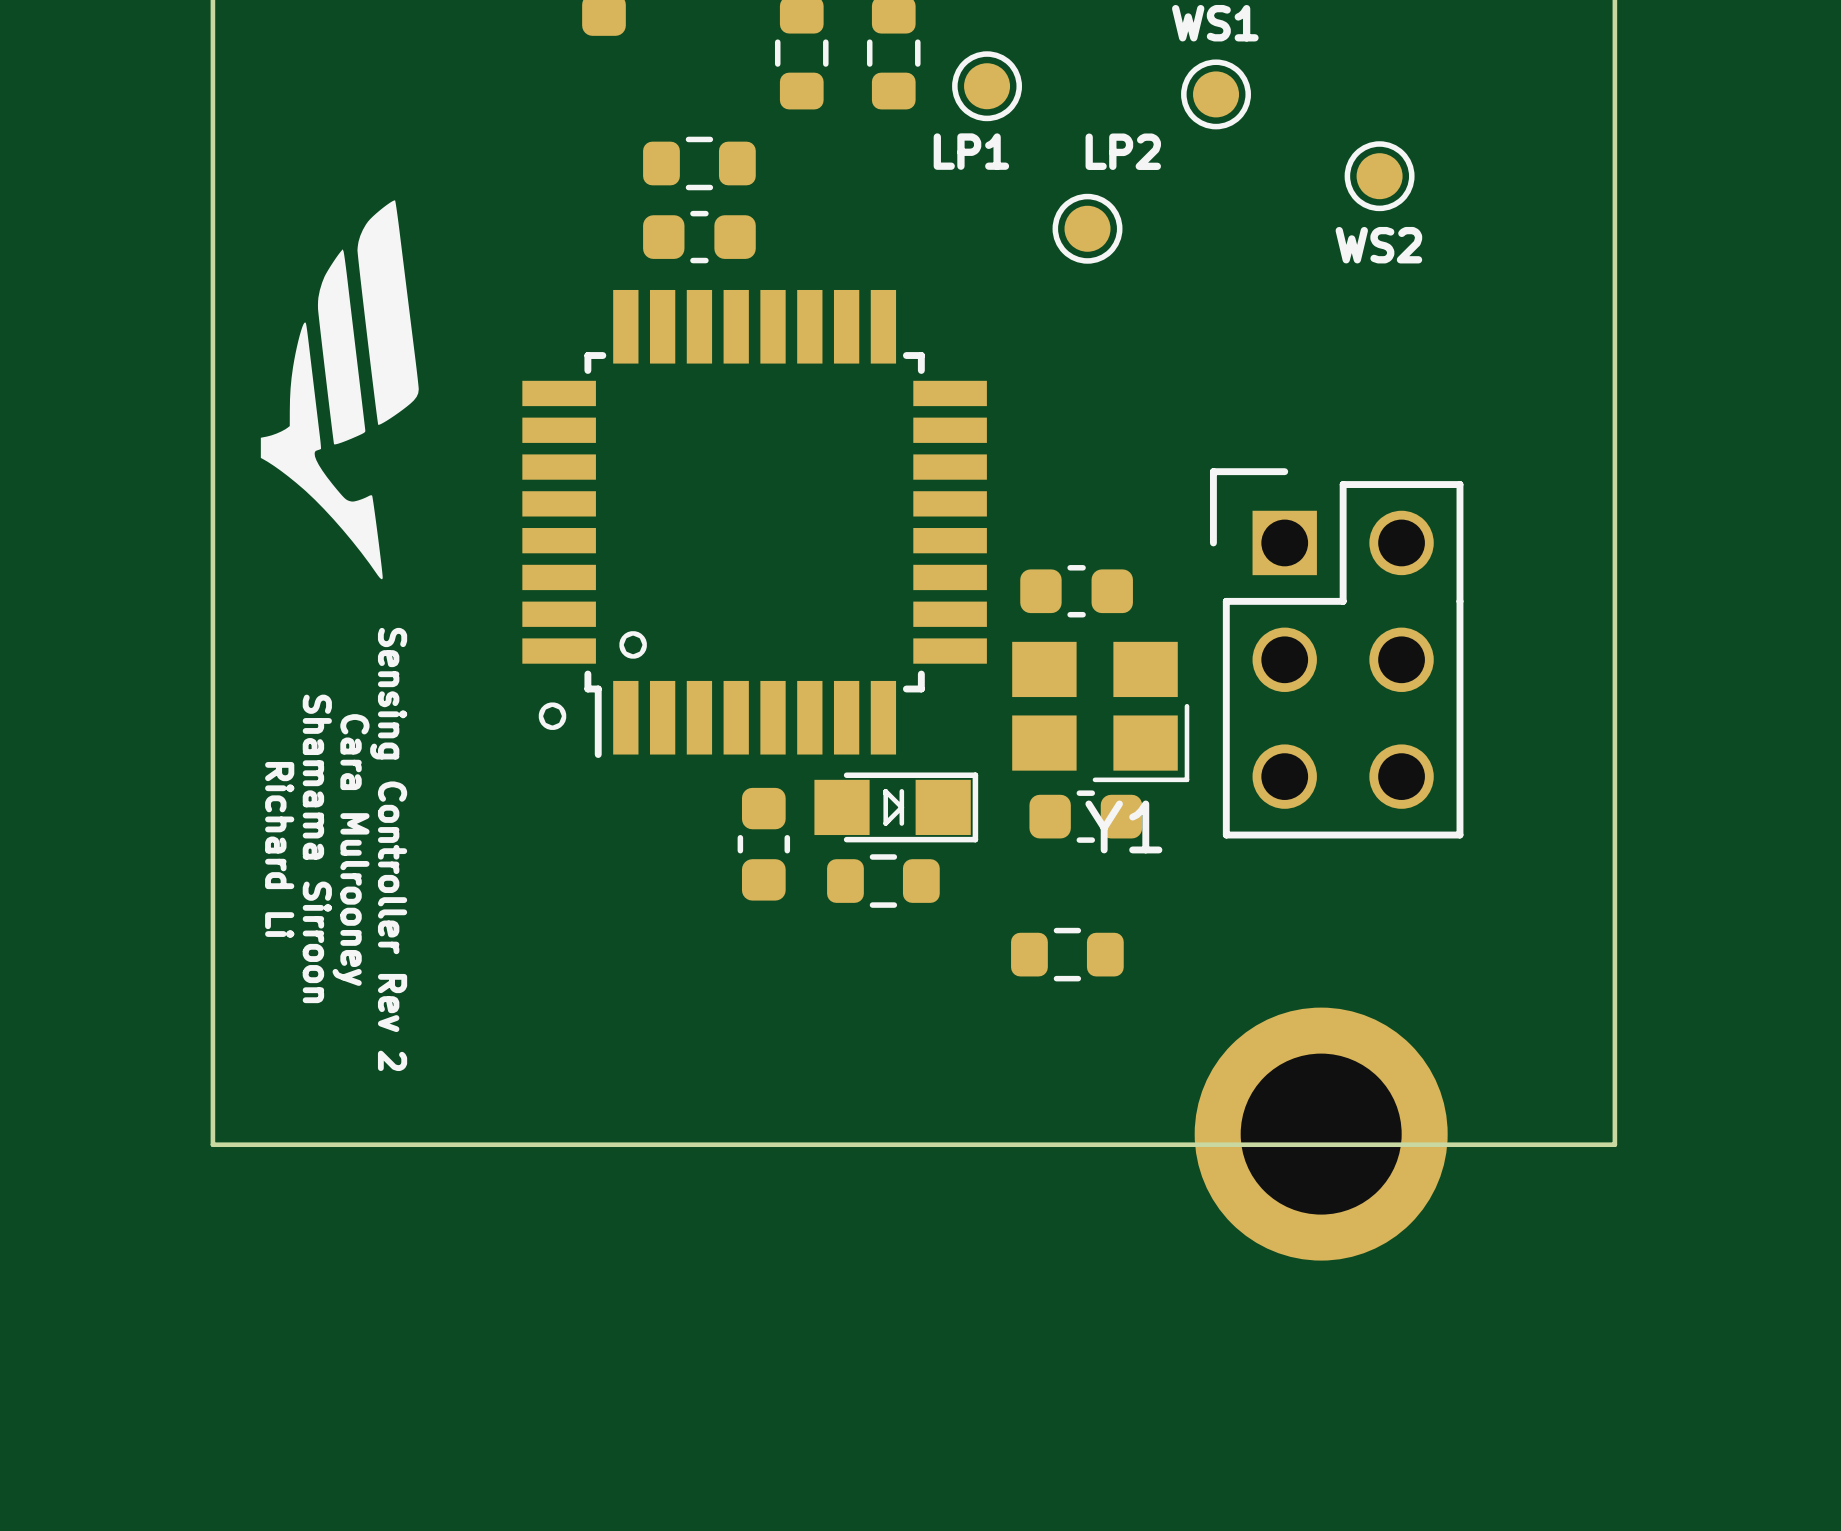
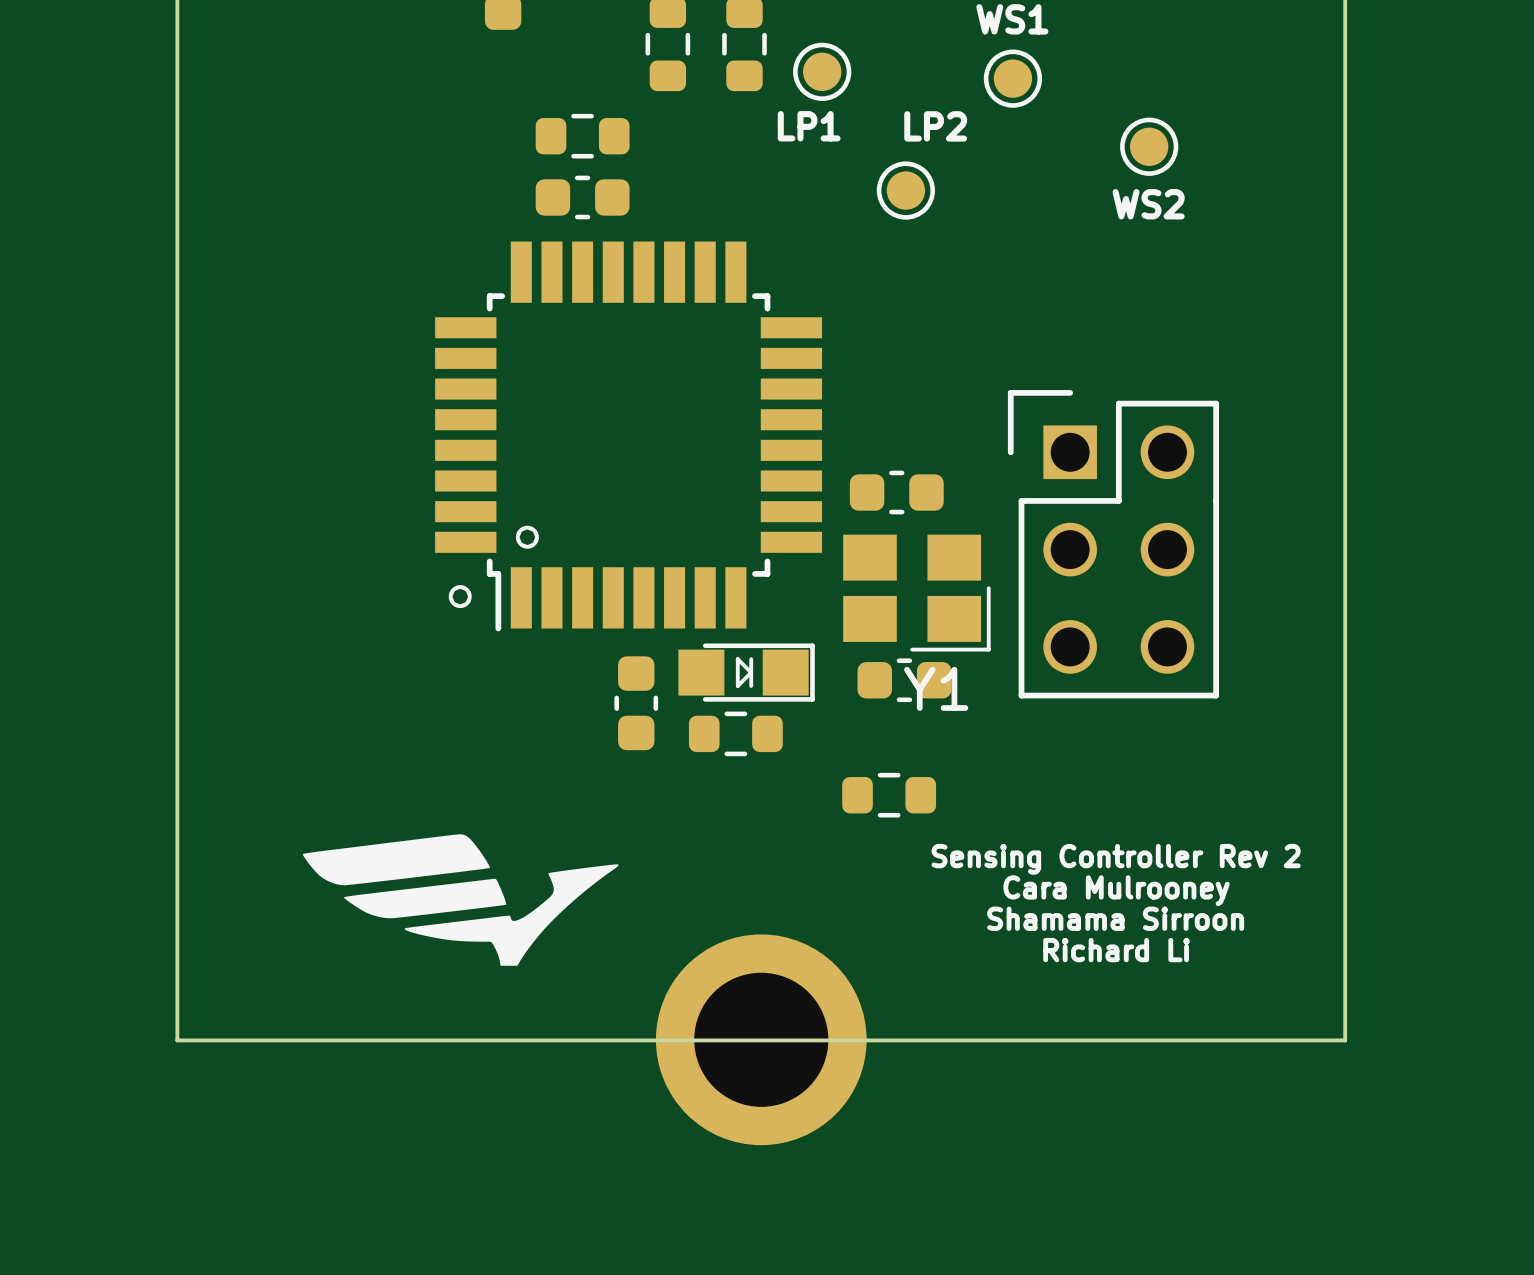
drawing: [260, 200, 419, 580] -> none
text rotation: 0° (317, 848) -> 90° counterclockwise (1115, 918)
text position: Shamama Sirroon (317, 848) -> Shamama Sirroon (1115, 918)
text rotation: 0° (388, 849) -> 90° counterclockwise (1116, 859)
text position: Sensing Controller Rev 2 (388, 849) -> Sensing Controller Rev 2 (1116, 859)
text rotation: 0° (279, 850) -> 90° counterclockwise (1116, 950)
text position: Richard Li (279, 850) -> Richard Li (1116, 950)
text rotation: 0° (351, 850) -> 90° counterclockwise (1116, 890)
text position: Cara Mulrooney (351, 850) -> Cara Mulrooney (1116, 890)
drawing: none -> [302, 834, 619, 966]
part position: (1321, 1134) -> (761, 1039)
board edge: (212, 1144) (1614, 1144) -> (177, 953) (177, 1040) (1345, 1040) (1345, 953)

